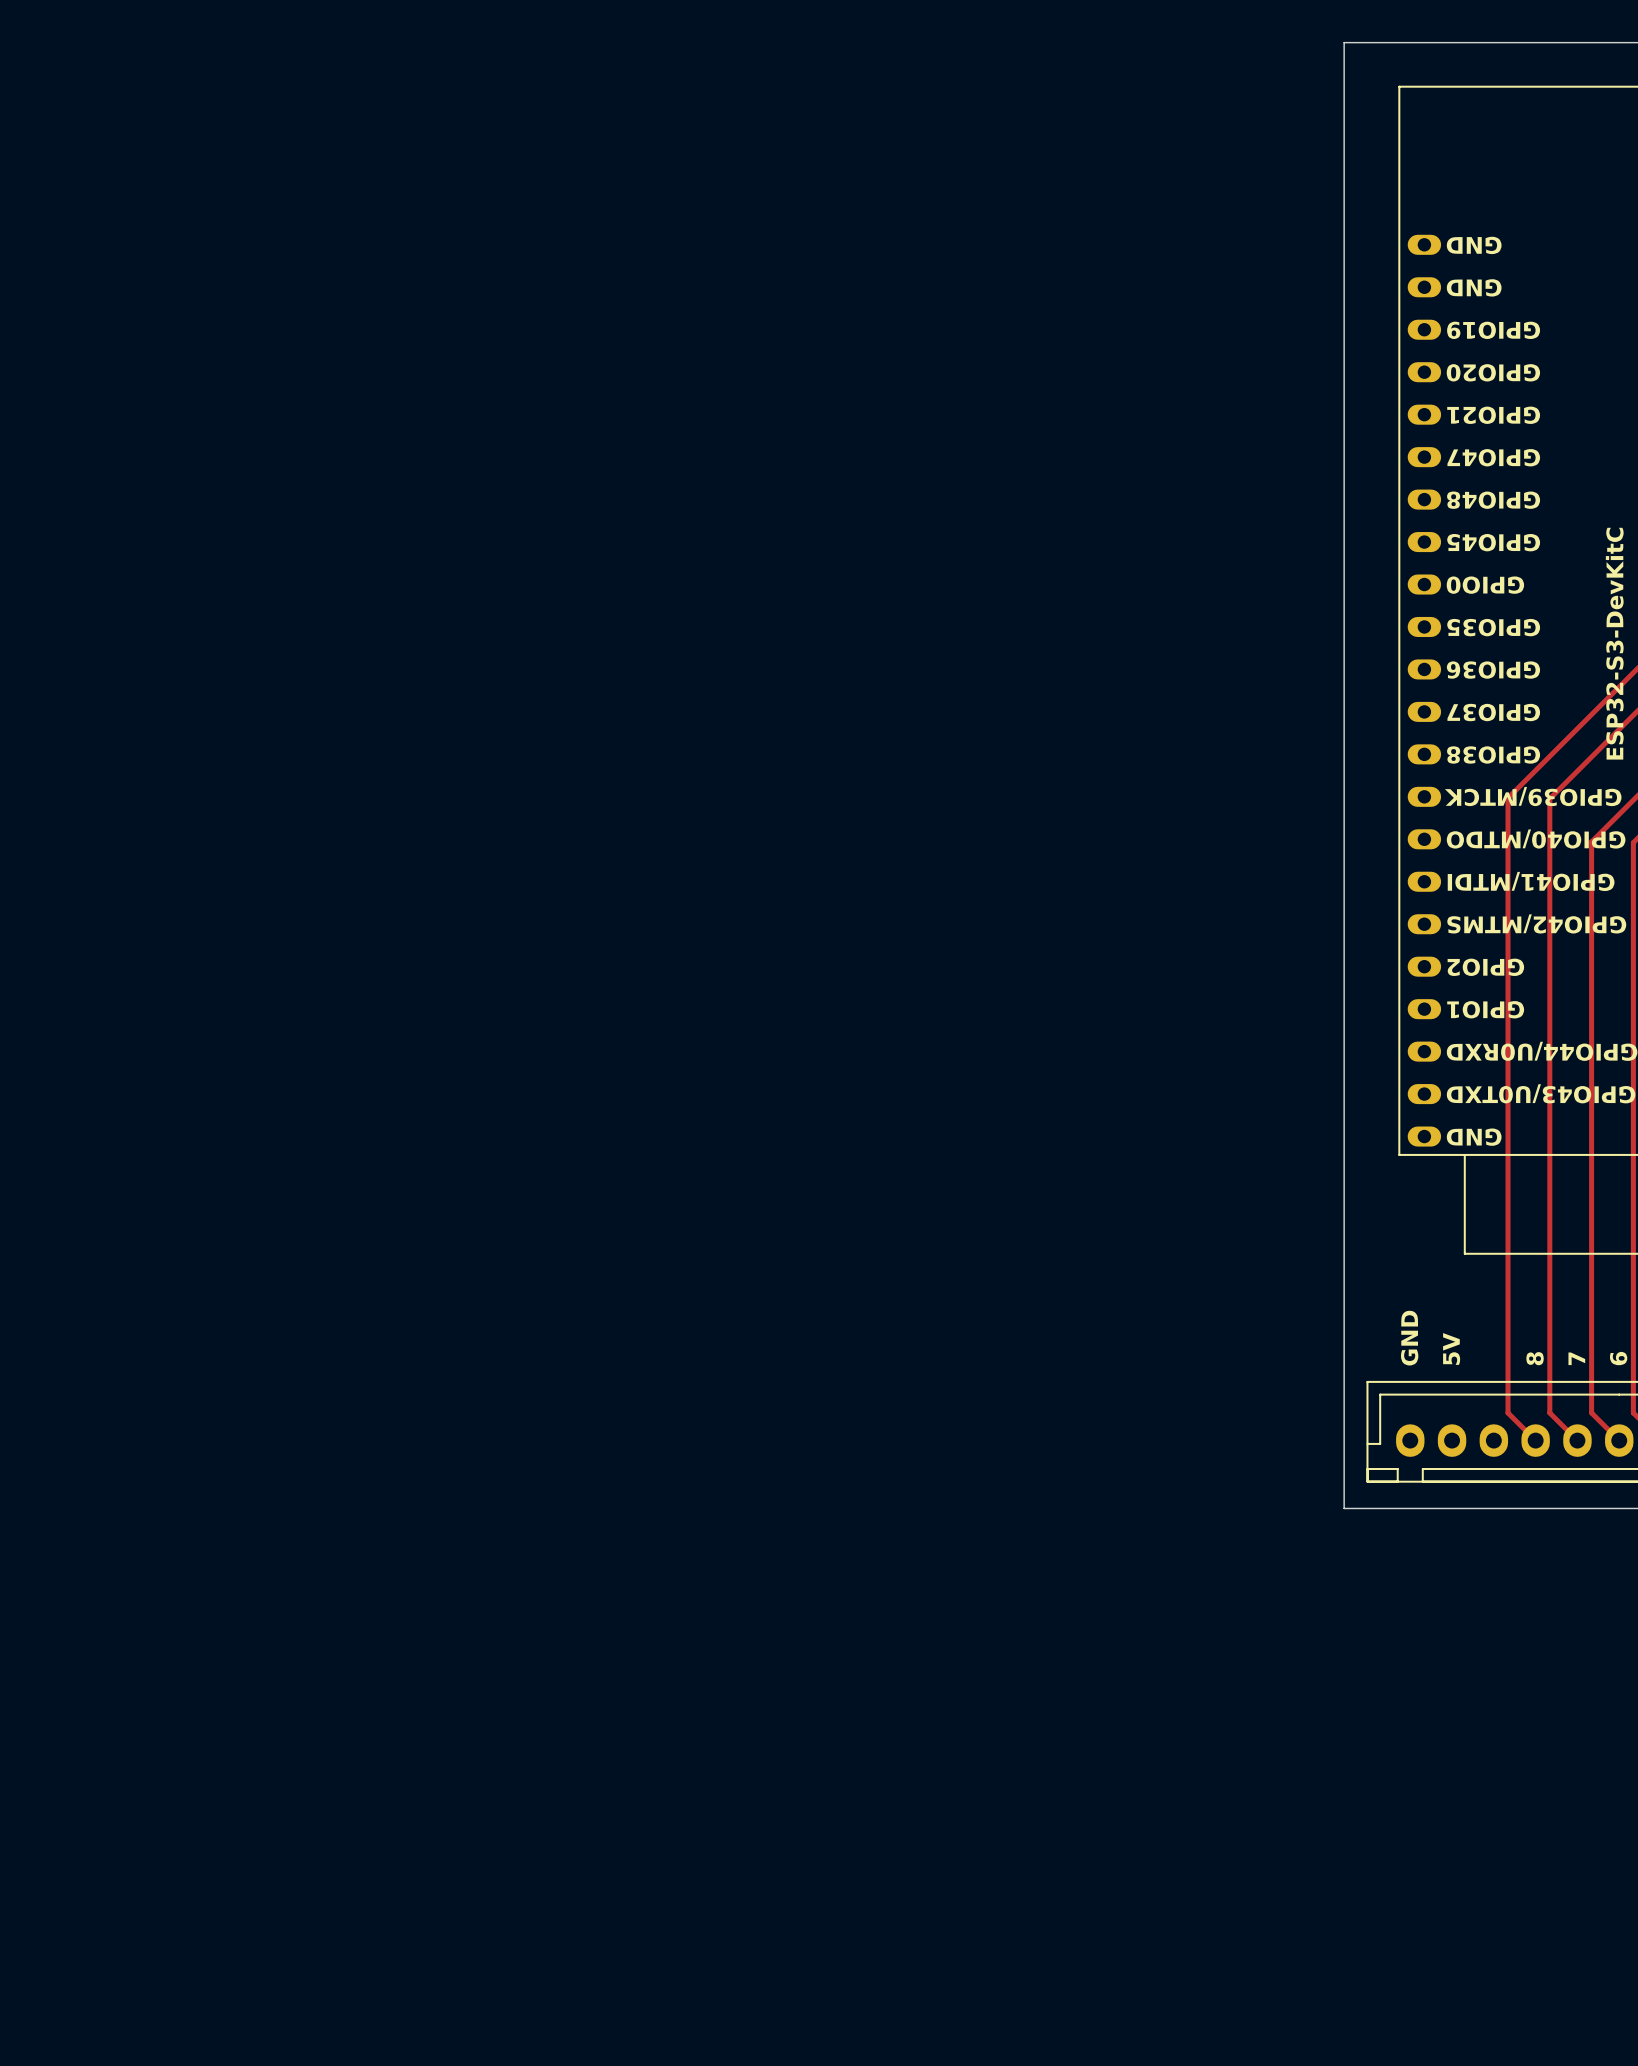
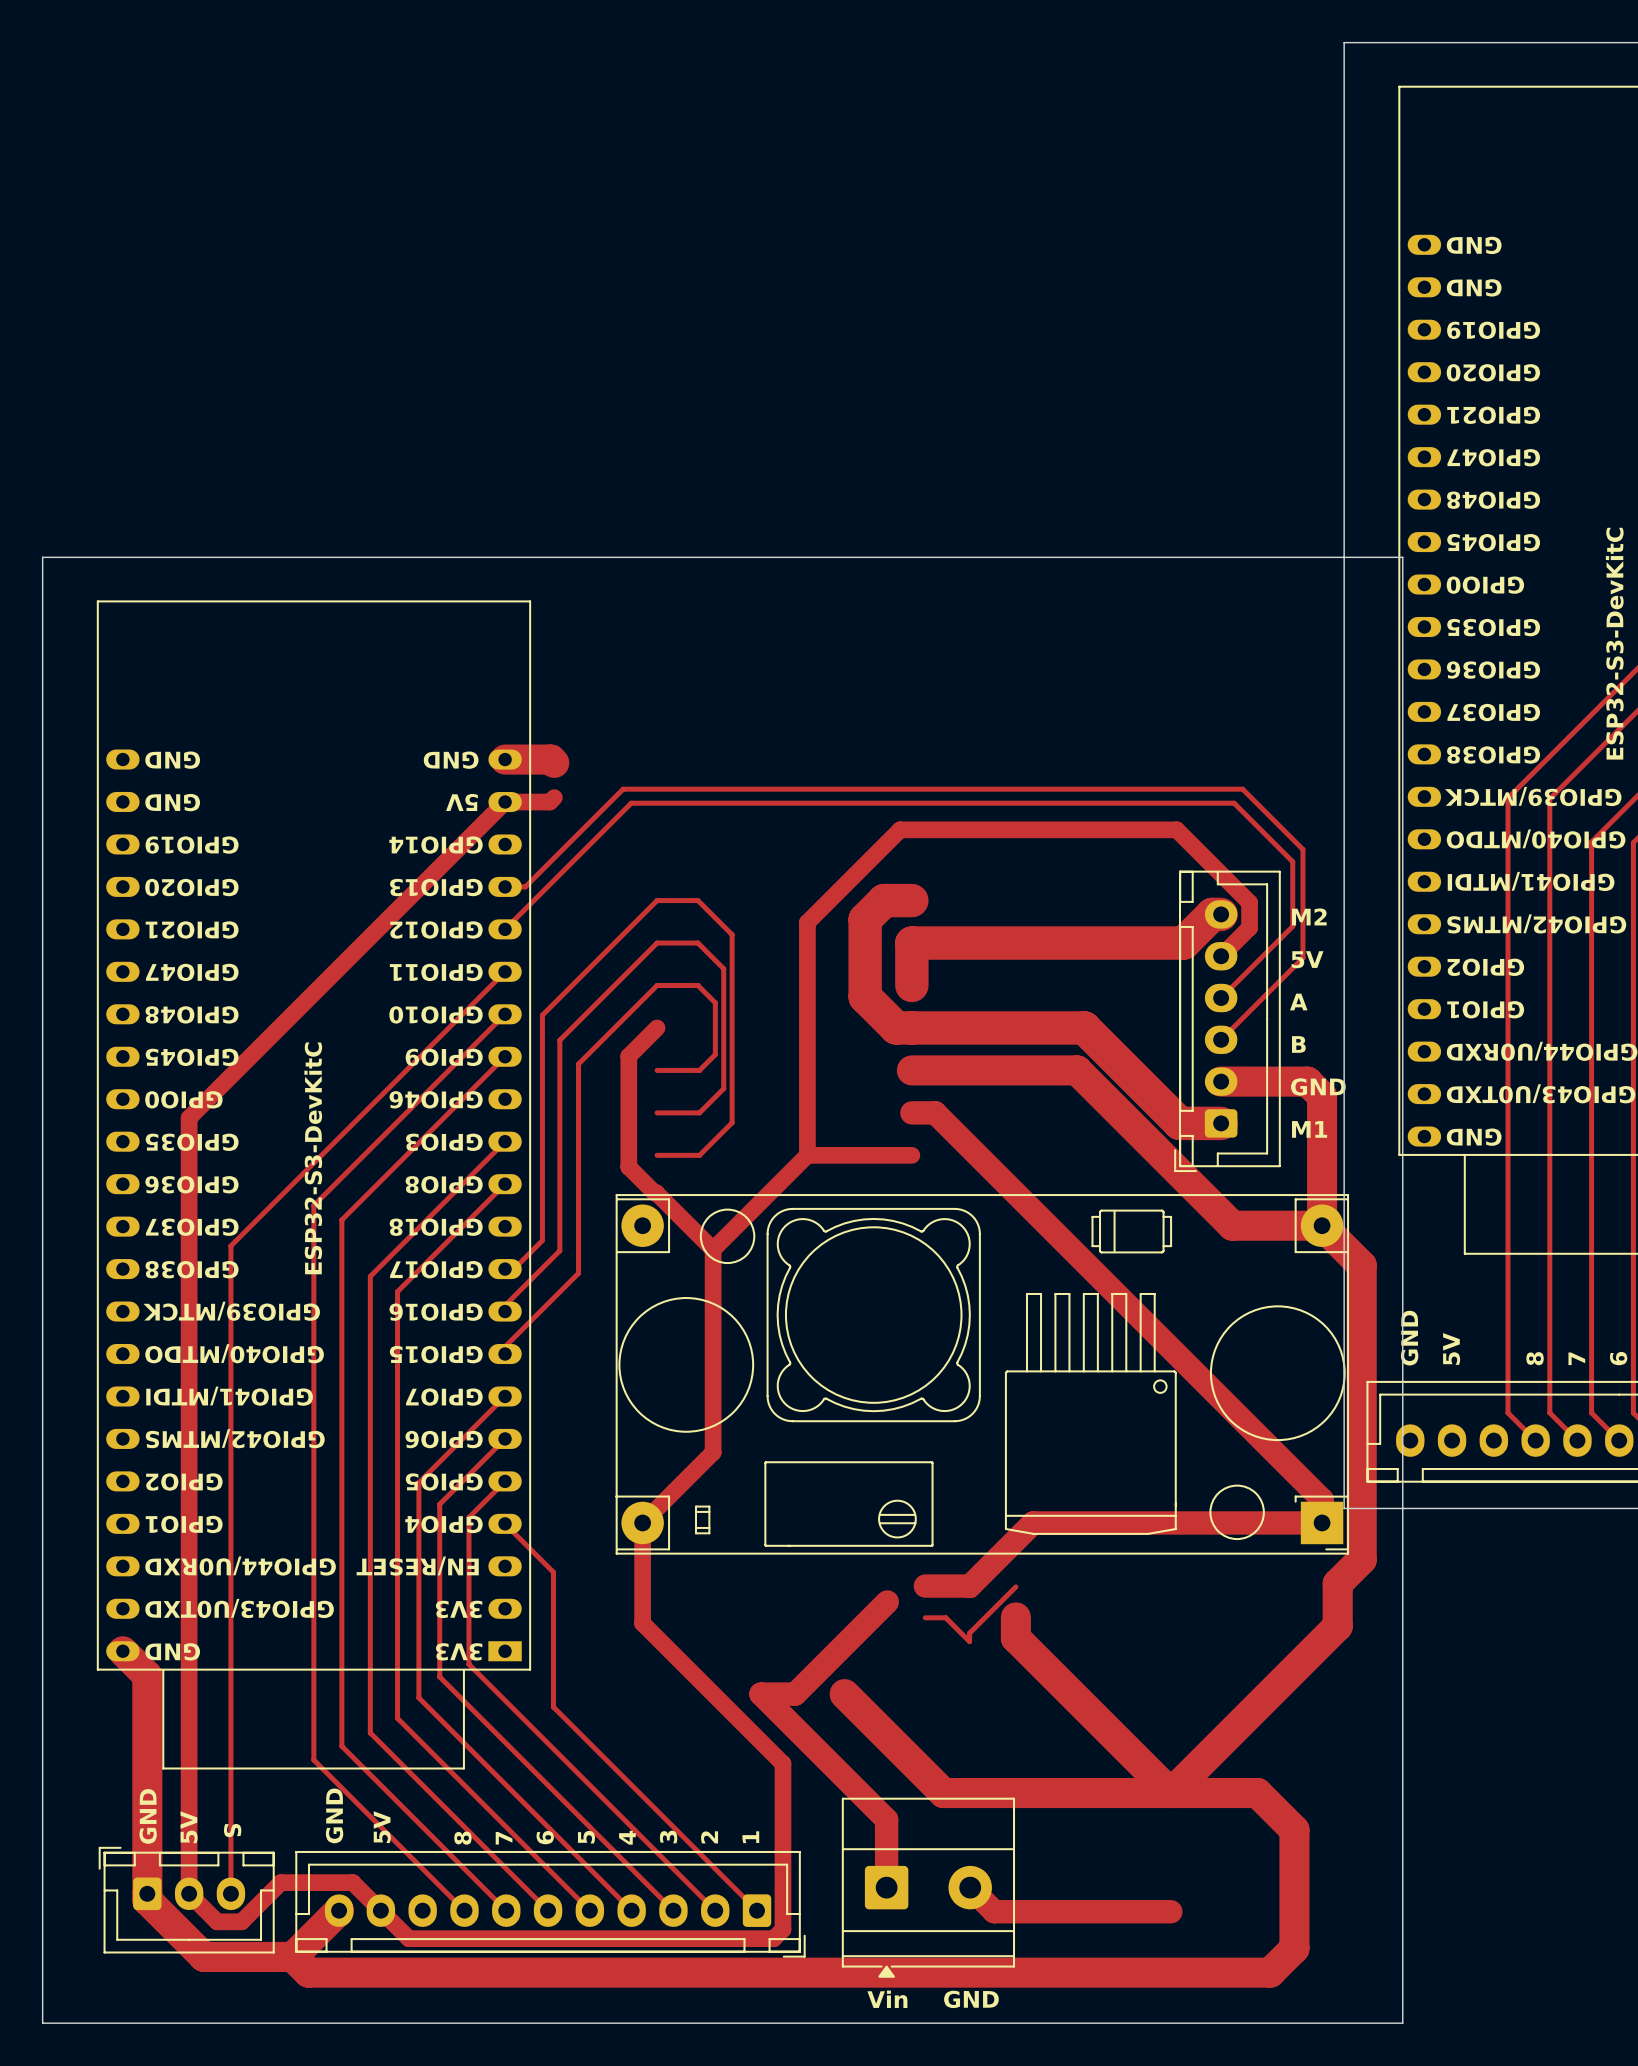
board edge: none -> (42, 557) (42, 2023) (1402, 2023) (1402, 557) (42, 557)
track: none -> (505, 759) (550, 759) (554, 762)
track: none -> (554, 797) (549, 802) (505, 802) (189, 1118) (189, 1893) (217, 1921) (241, 1921) (280, 1882) (352, 1882) (408, 1938) (773, 1938) (782, 1929) (782, 1763) (642, 1623) (642, 1522) (713, 1452) (713, 1249)
track: none -> (505, 886) (525, 886) (623, 789) (1242, 789) (1302, 849) (1302, 958) (1221, 1039)
track: none -> (911, 900) (884, 900) (865, 919) (865, 996) (896, 1027) (1084, 1027) (1179, 1123) (1221, 1123)
track: none -> (1221, 914) (1212, 914) (1183, 943) (911, 943) (911, 985)
text: none -> M2 (1309, 916)
track: none -> (505, 929) (631, 803) (1234, 803) (1292, 861) (1292, 926) (1221, 998)
track: none -> (1221, 956) (1249, 927) (1249, 902) (1176, 829) (900, 829) (807, 922) (807, 1155)
text: none -> 5V (1307, 959)
track: none -> (505, 971) (230, 1245) (230, 1893)
text: none -> A (1298, 1002)
track: none -> (505, 1014) (313, 1205) (313, 1760) (464, 1910)
part: none -> (1227, 1021)
track: none -> (657, 1027) (628, 1056) (628, 1167) (713, 1249)
text: none -> B (1298, 1044)
track: none -> (505, 1056) (341, 1219) (341, 1746) (506, 1910)
track: none -> (657, 1070) (699, 1070) (715, 1054) (715, 1002) (697, 985) (657, 985) (578, 1064) (578, 1273) (505, 1346) (505, 1354)
track: none -> (911, 1070) (1077, 1070) (1232, 1225) (1322, 1225)
track: none -> (1221, 1081) (1307, 1081) (1322, 1096) (1322, 1225)
text: none -> GND (1318, 1086)
track: none -> (657, 1112) (699, 1112) (723, 1088) (723, 968) (697, 943) (657, 943) (559, 1040) (559, 1250) (505, 1305) (505, 1311)
track: none -> (911, 1112) (935, 1112) (1322, 1499) (1322, 1522) (1033, 1522) (969, 1586) (925, 1586)
text: none -> M1 (1309, 1129)
track: none -> (505, 1141) (370, 1276) (370, 1732) (548, 1910)
track: none -> (657, 1155) (699, 1155) (732, 1122) (732, 934) (697, 900) (657, 900) (542, 1015) (542, 1240) (513, 1269) (505, 1269)
track: none -> (807, 1155) (911, 1155)
track: none -> (807, 1155) (713, 1249)
part: none -> ESP32-S3-DevKitC (313, 1184)
track: none -> (505, 1184) (397, 1291) (397, 1718) (589, 1910)
track: none -> (1322, 1225) (1361, 1265) (1361, 1559) (1337, 1583) (1337, 1626) (1170, 1793) (1015, 1638) (1015, 1617)
part: none -> (982, 1374)
track: none -> (505, 1396) (418, 1482) (418, 1697) (631, 1910)
track: none -> (505, 1438) (439, 1504) (439, 1676) (673, 1910)
track: none -> (505, 1481) (468, 1517) (468, 1664) (715, 1910)
track: none -> (505, 1523) (553, 1572) (553, 1707) (757, 1910)
track: none -> (1015, 1586) (969, 1633) (969, 1641) (945, 1617) (925, 1617)
track: none -> (887, 1601) (795, 1694) (761, 1694) (886, 1819) (886, 1887)
track: none -> (122, 1651) (147, 1675) (147, 1900) (204, 1956) (292, 1956)
track: none -> (844, 1694) (943, 1793) (1257, 1793) (1294, 1829) (1294, 1948) (1270, 1972) (308, 1972) (292, 1956)
text: none -> GND (334, 1815)
text: none -> GND (148, 1816)
text: none -> 5V (189, 1827)
text: none -> 5V (382, 1827)
text: none -> S (232, 1830)
text: none -> 6 (545, 1837)
text: none -> 5 (586, 1837)
text: none -> 4 (627, 1837)
text: none -> 3 (668, 1837)
text: none -> 2 (709, 1837)
text: none -> 1 (750, 1837)
text: none -> 8 (462, 1838)
text: none -> 7 (504, 1838)
part: none -> (928, 1887)
track: none -> (970, 1887) (994, 1911) (1170, 1911)
part: none -> (186, 1900)
part: none -> (550, 1904)
track: none -> (339, 1910) (292, 1956)
text: none -> Vin (887, 1999)
text: none -> GND (971, 1999)

